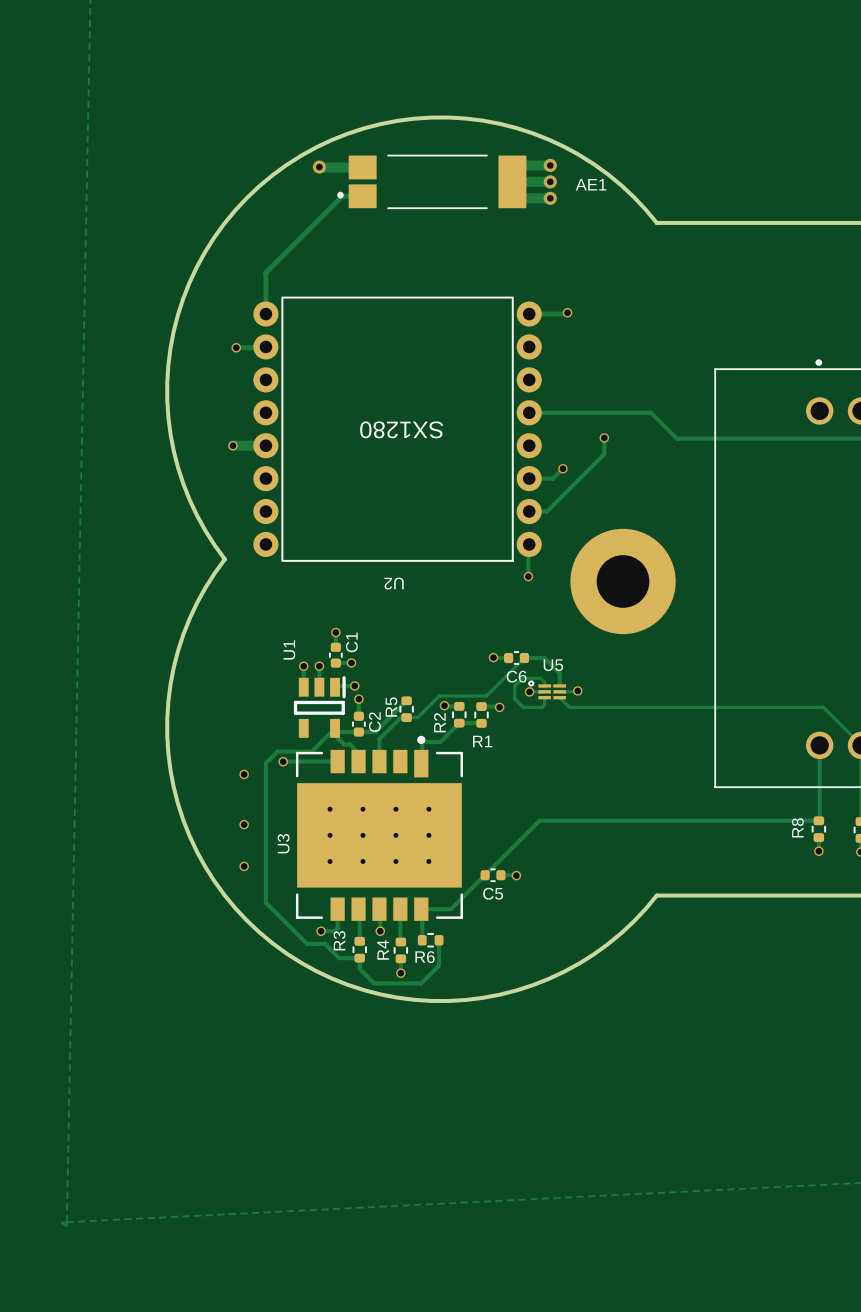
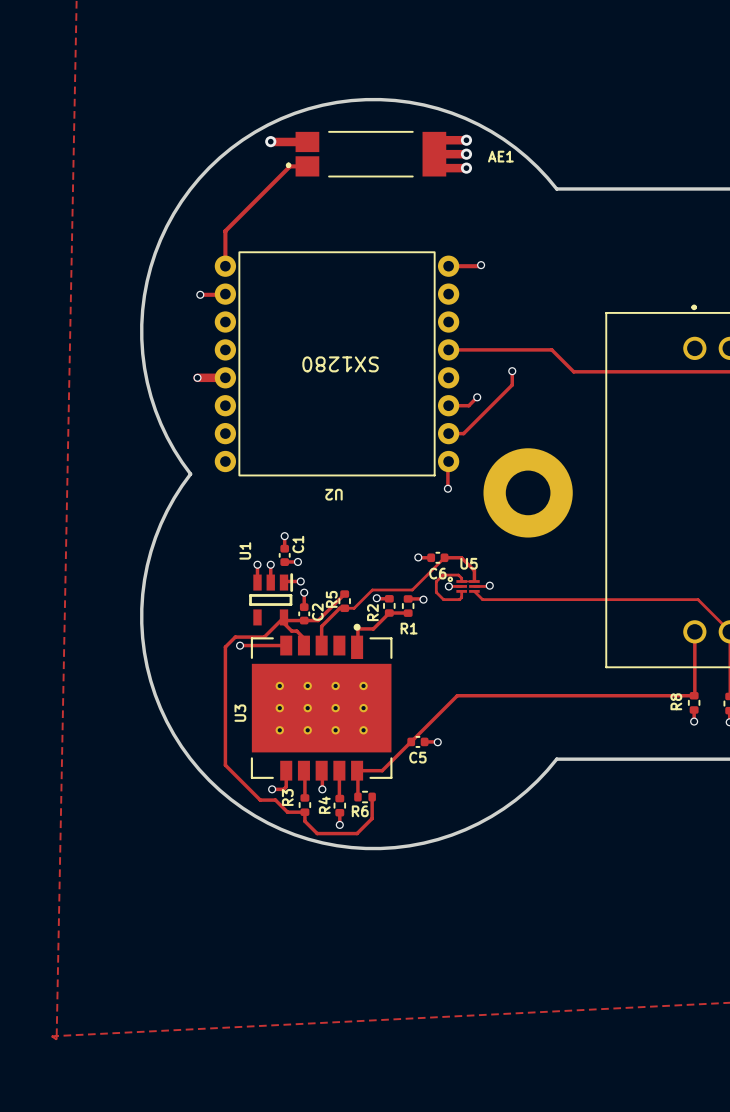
via: (244, 774) -> none
via: (244, 824) -> none
via: (244, 866) -> none

